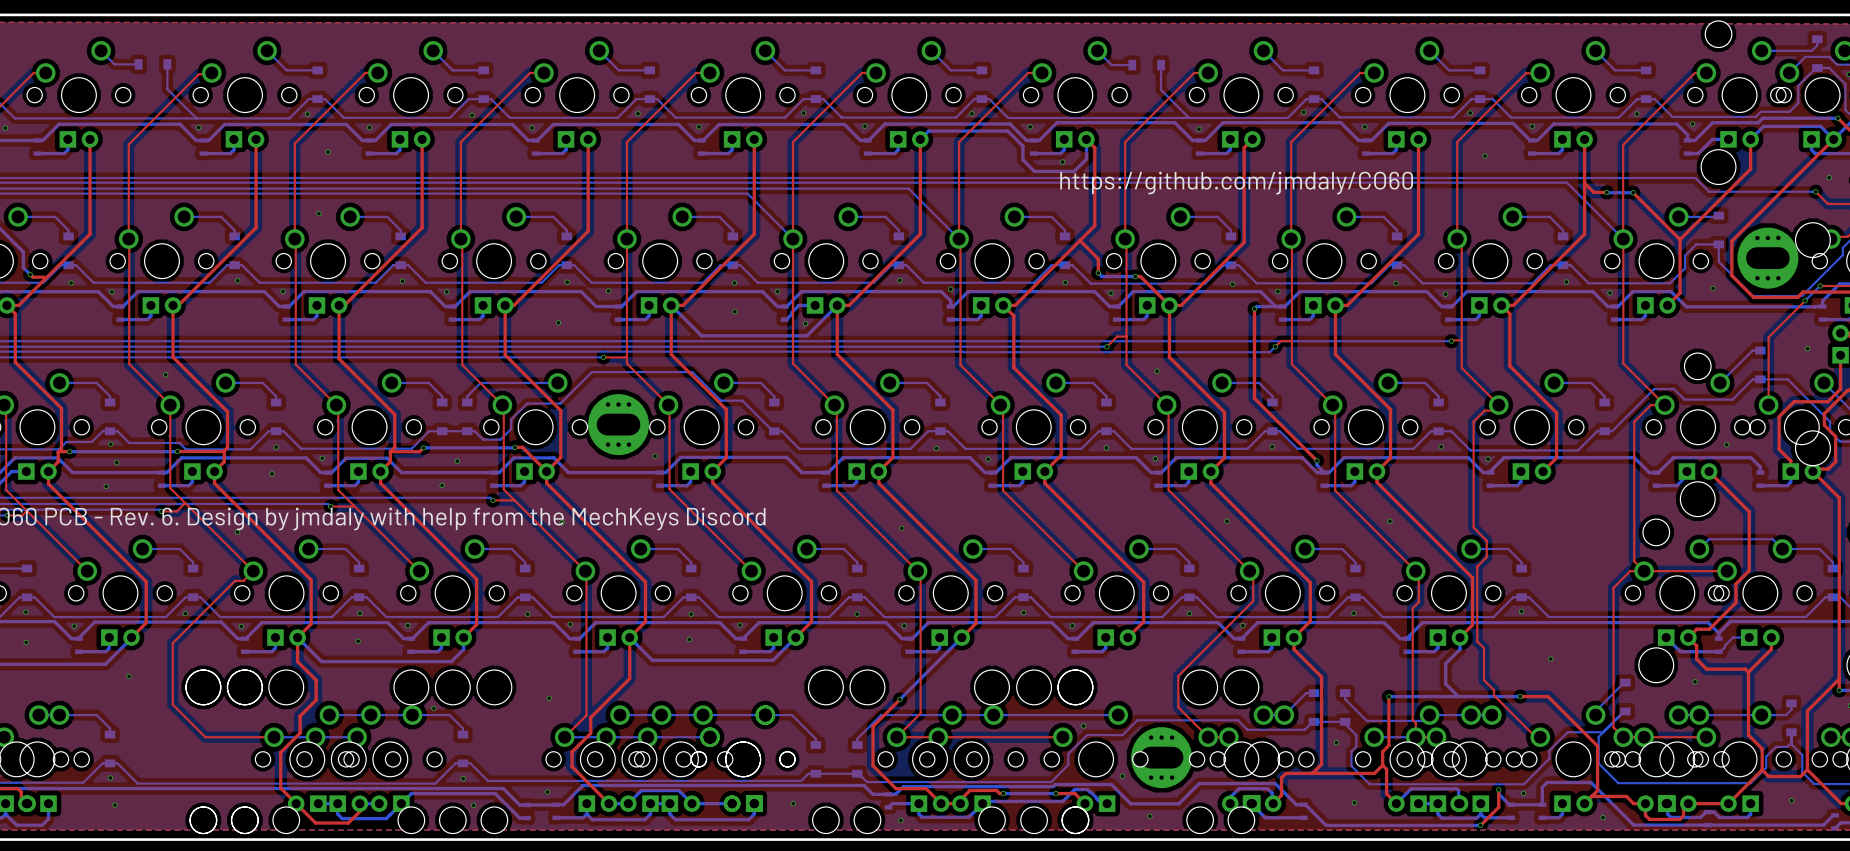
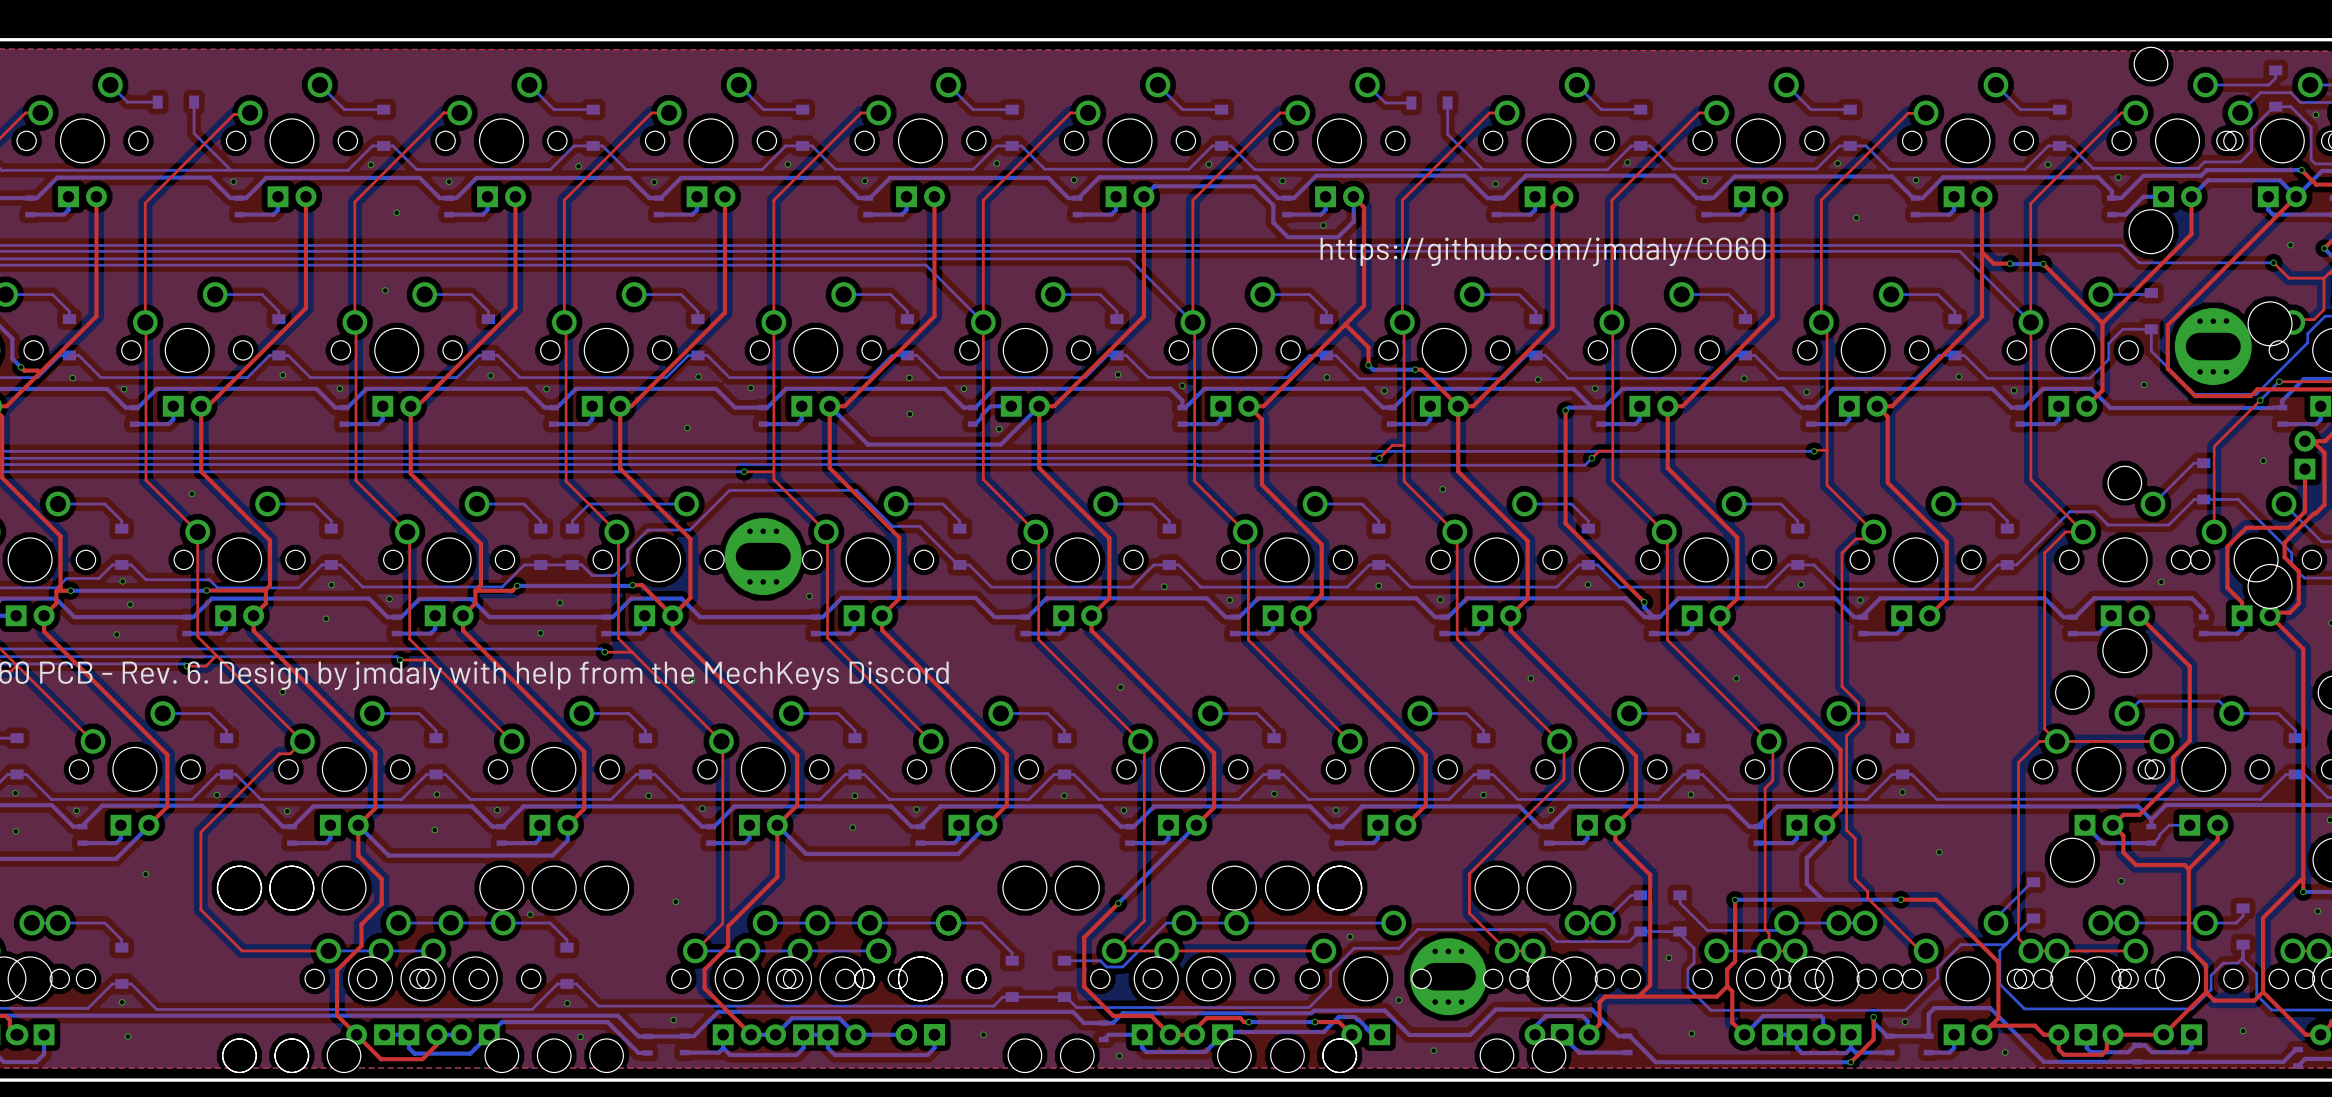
bottom track: (938, 715) (881, 715) (857, 738) (857, 744) -> (1166, 923) (1122, 966) (1106, 966) (1100, 960) (1064, 960)

